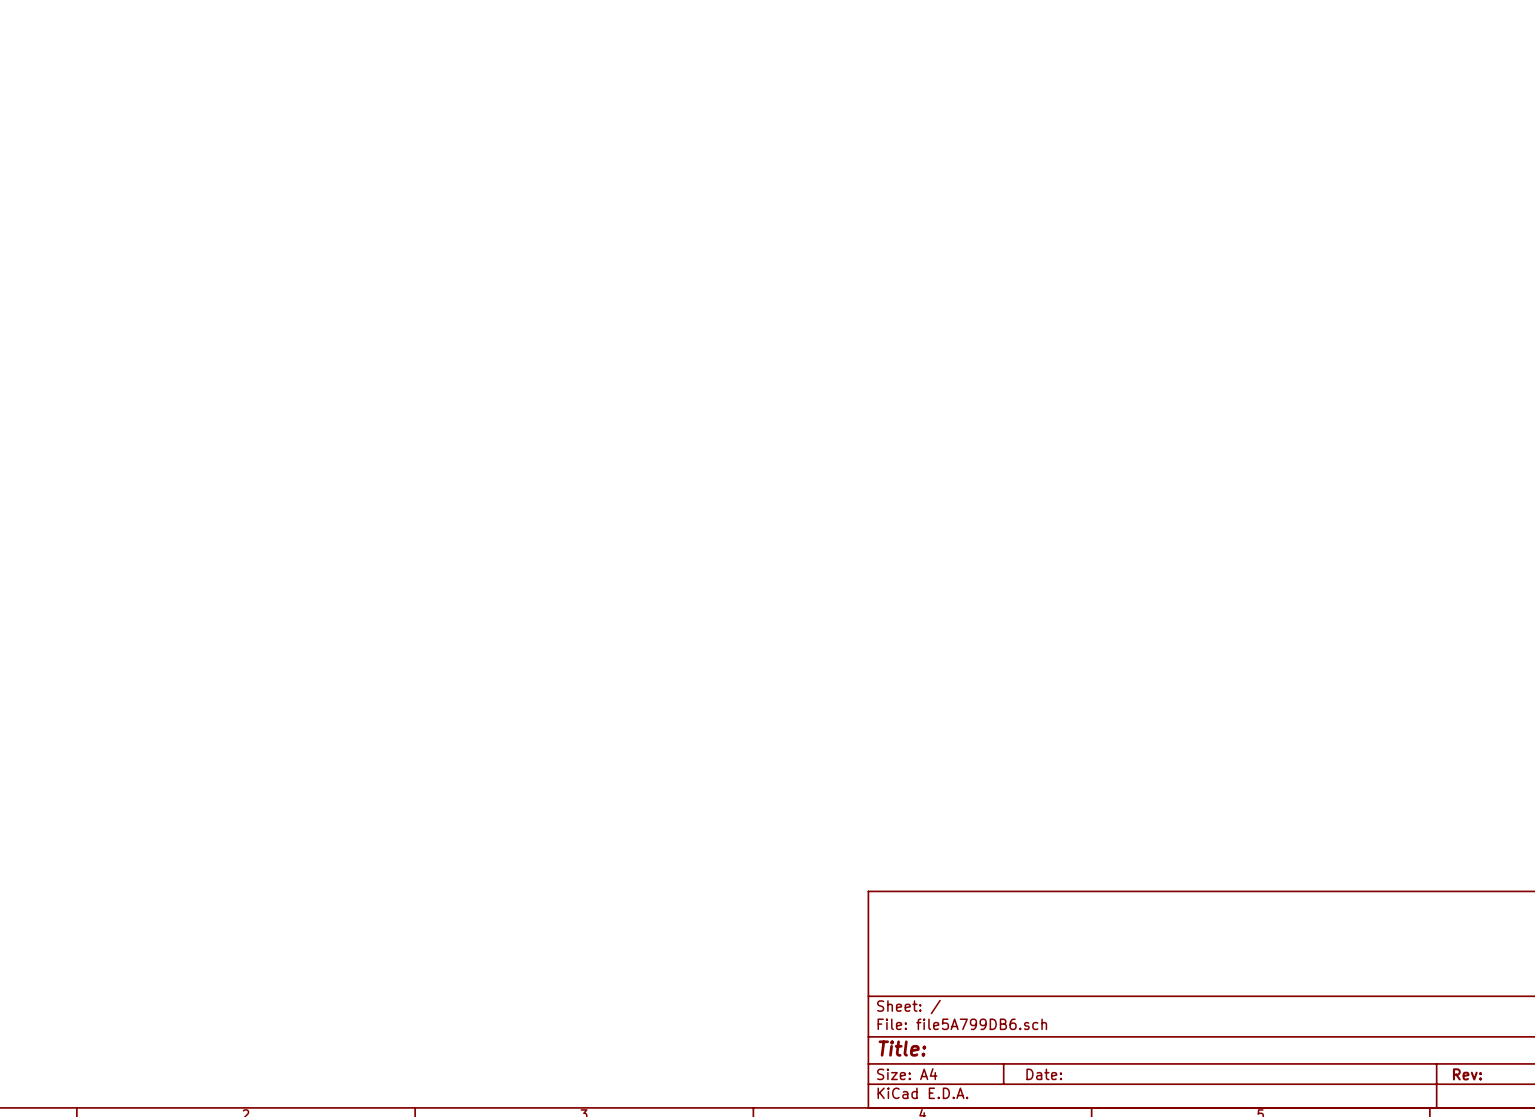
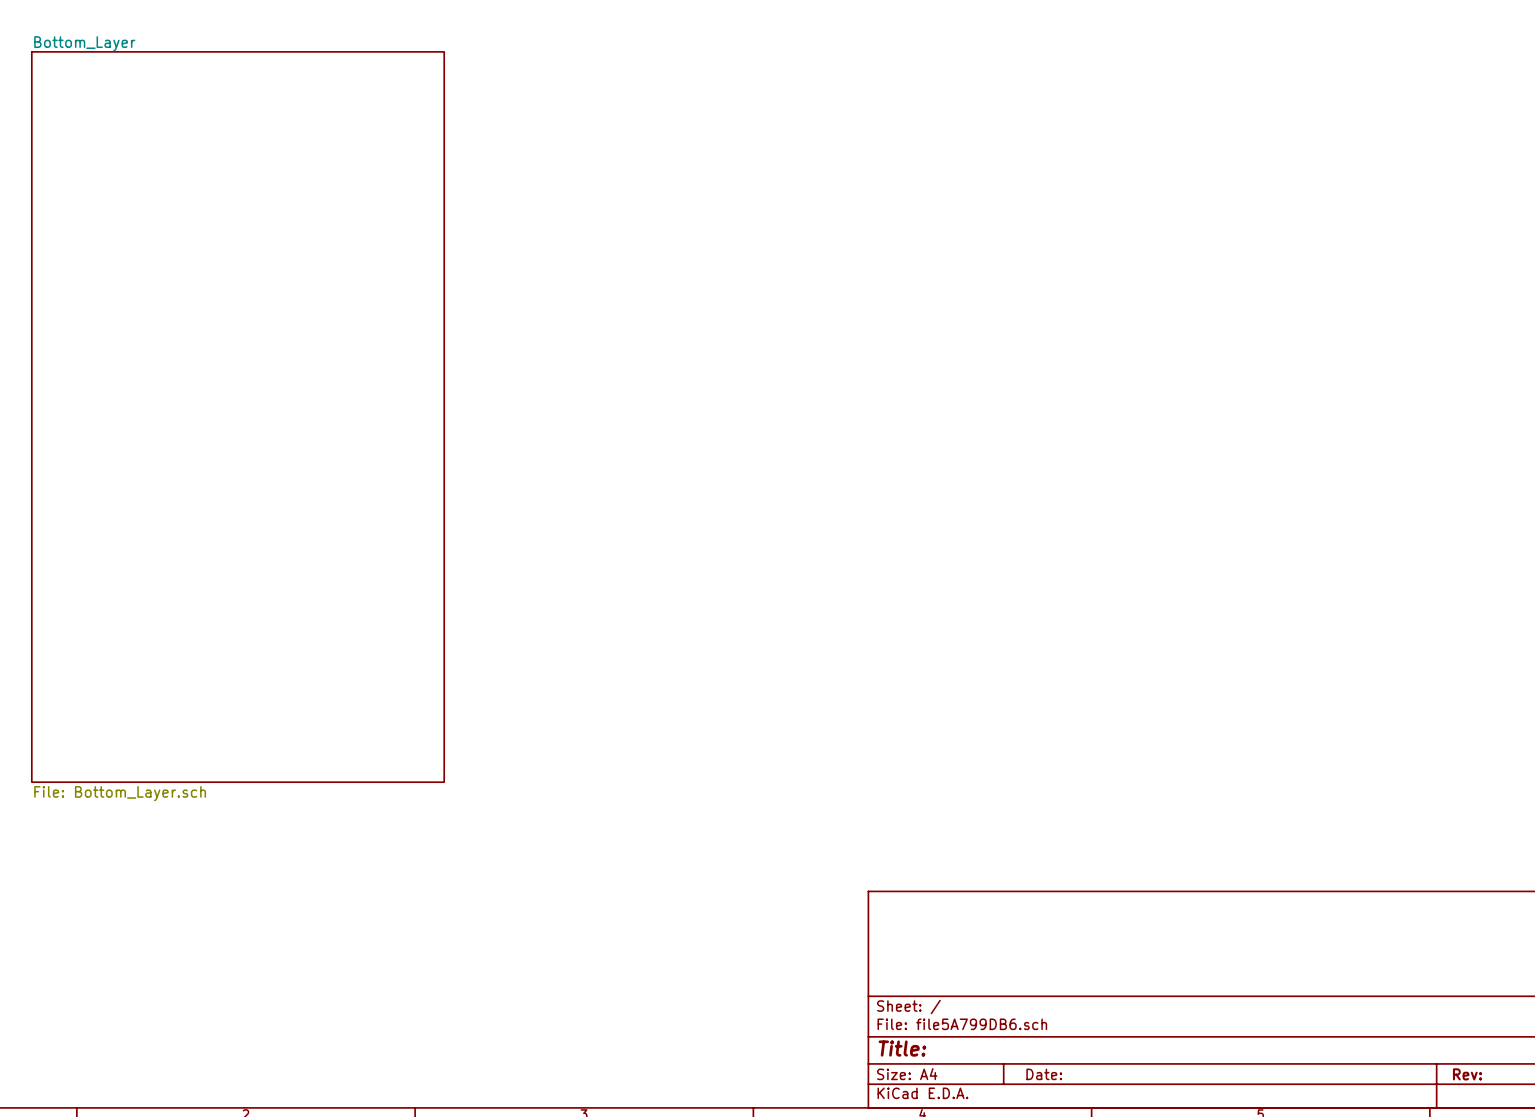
sheet Bottom_Layer: none -> File: Bottom_Layer.sch (238, 417)

